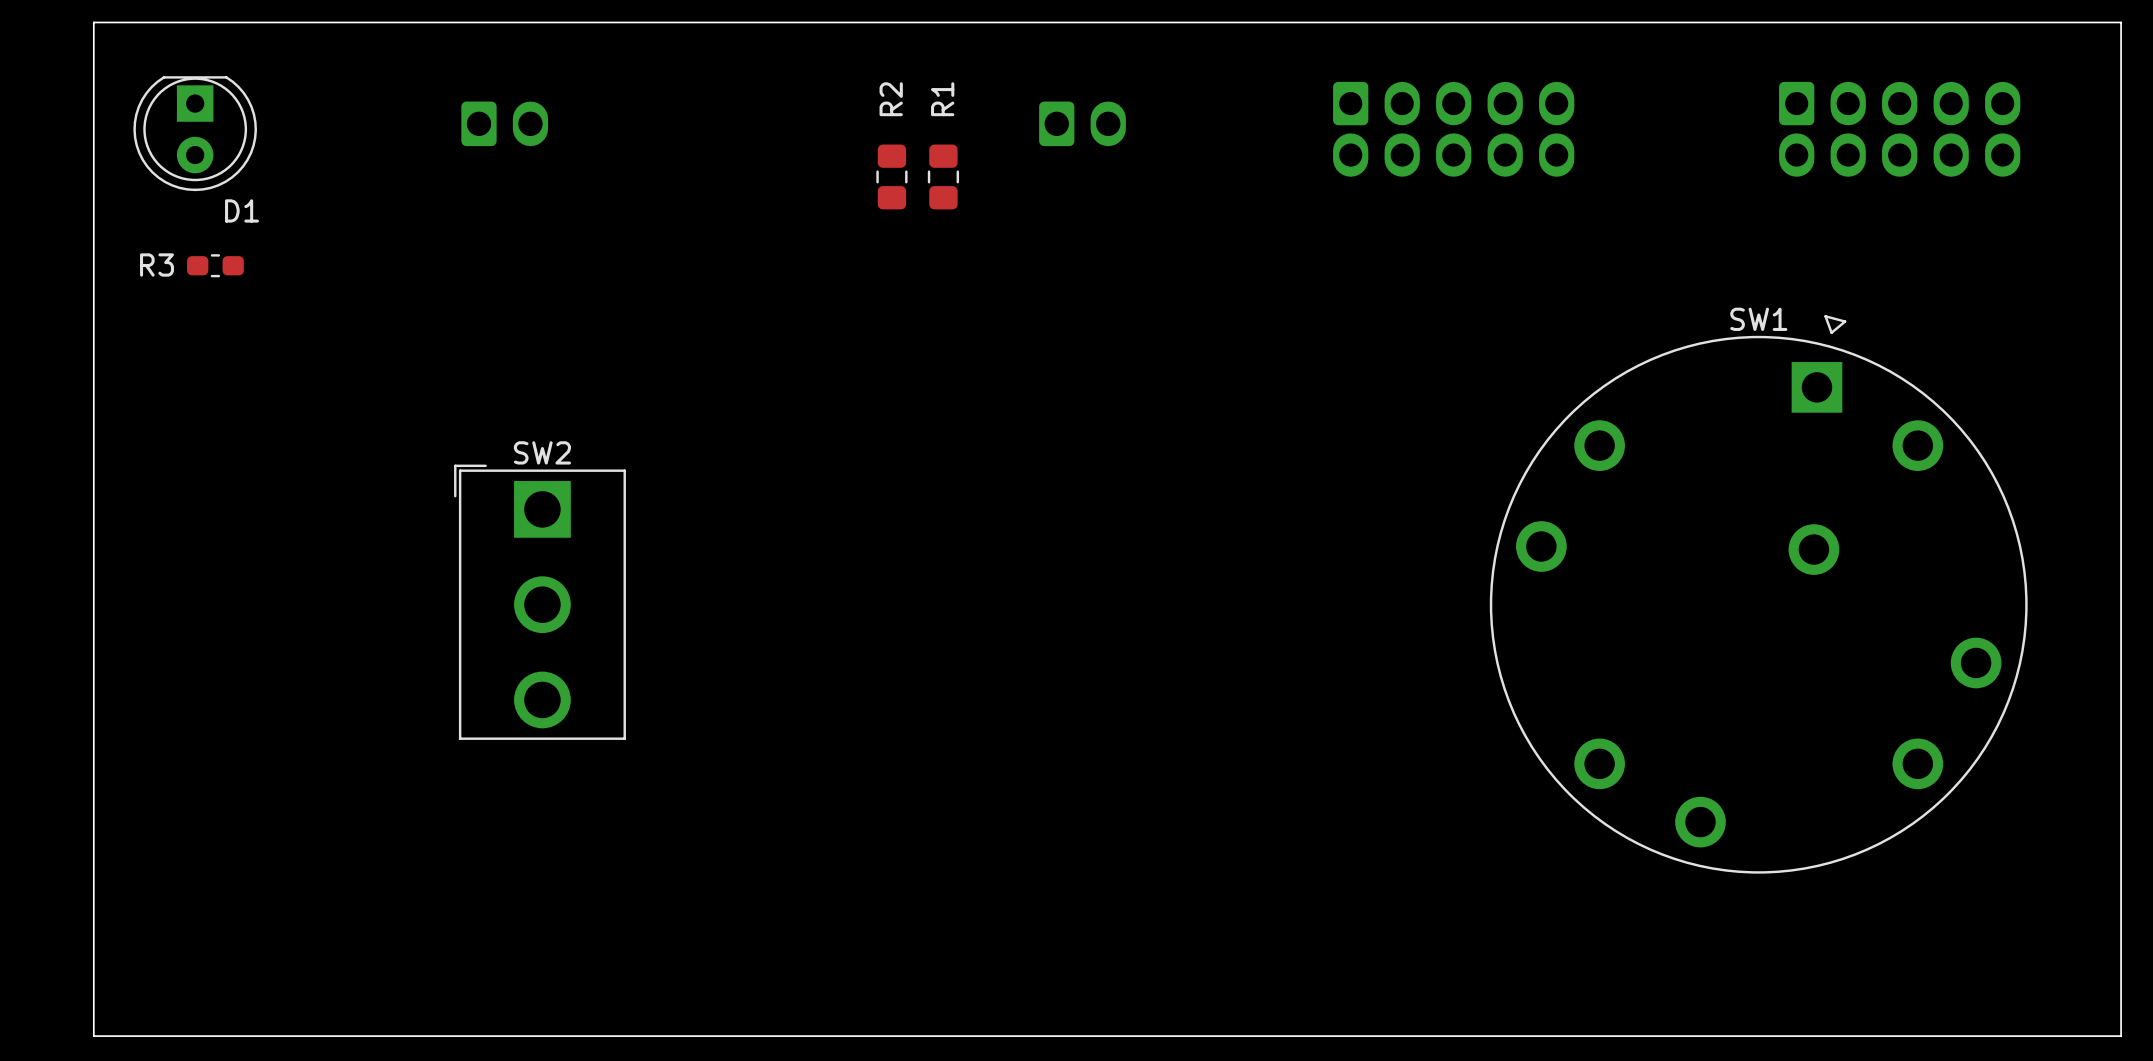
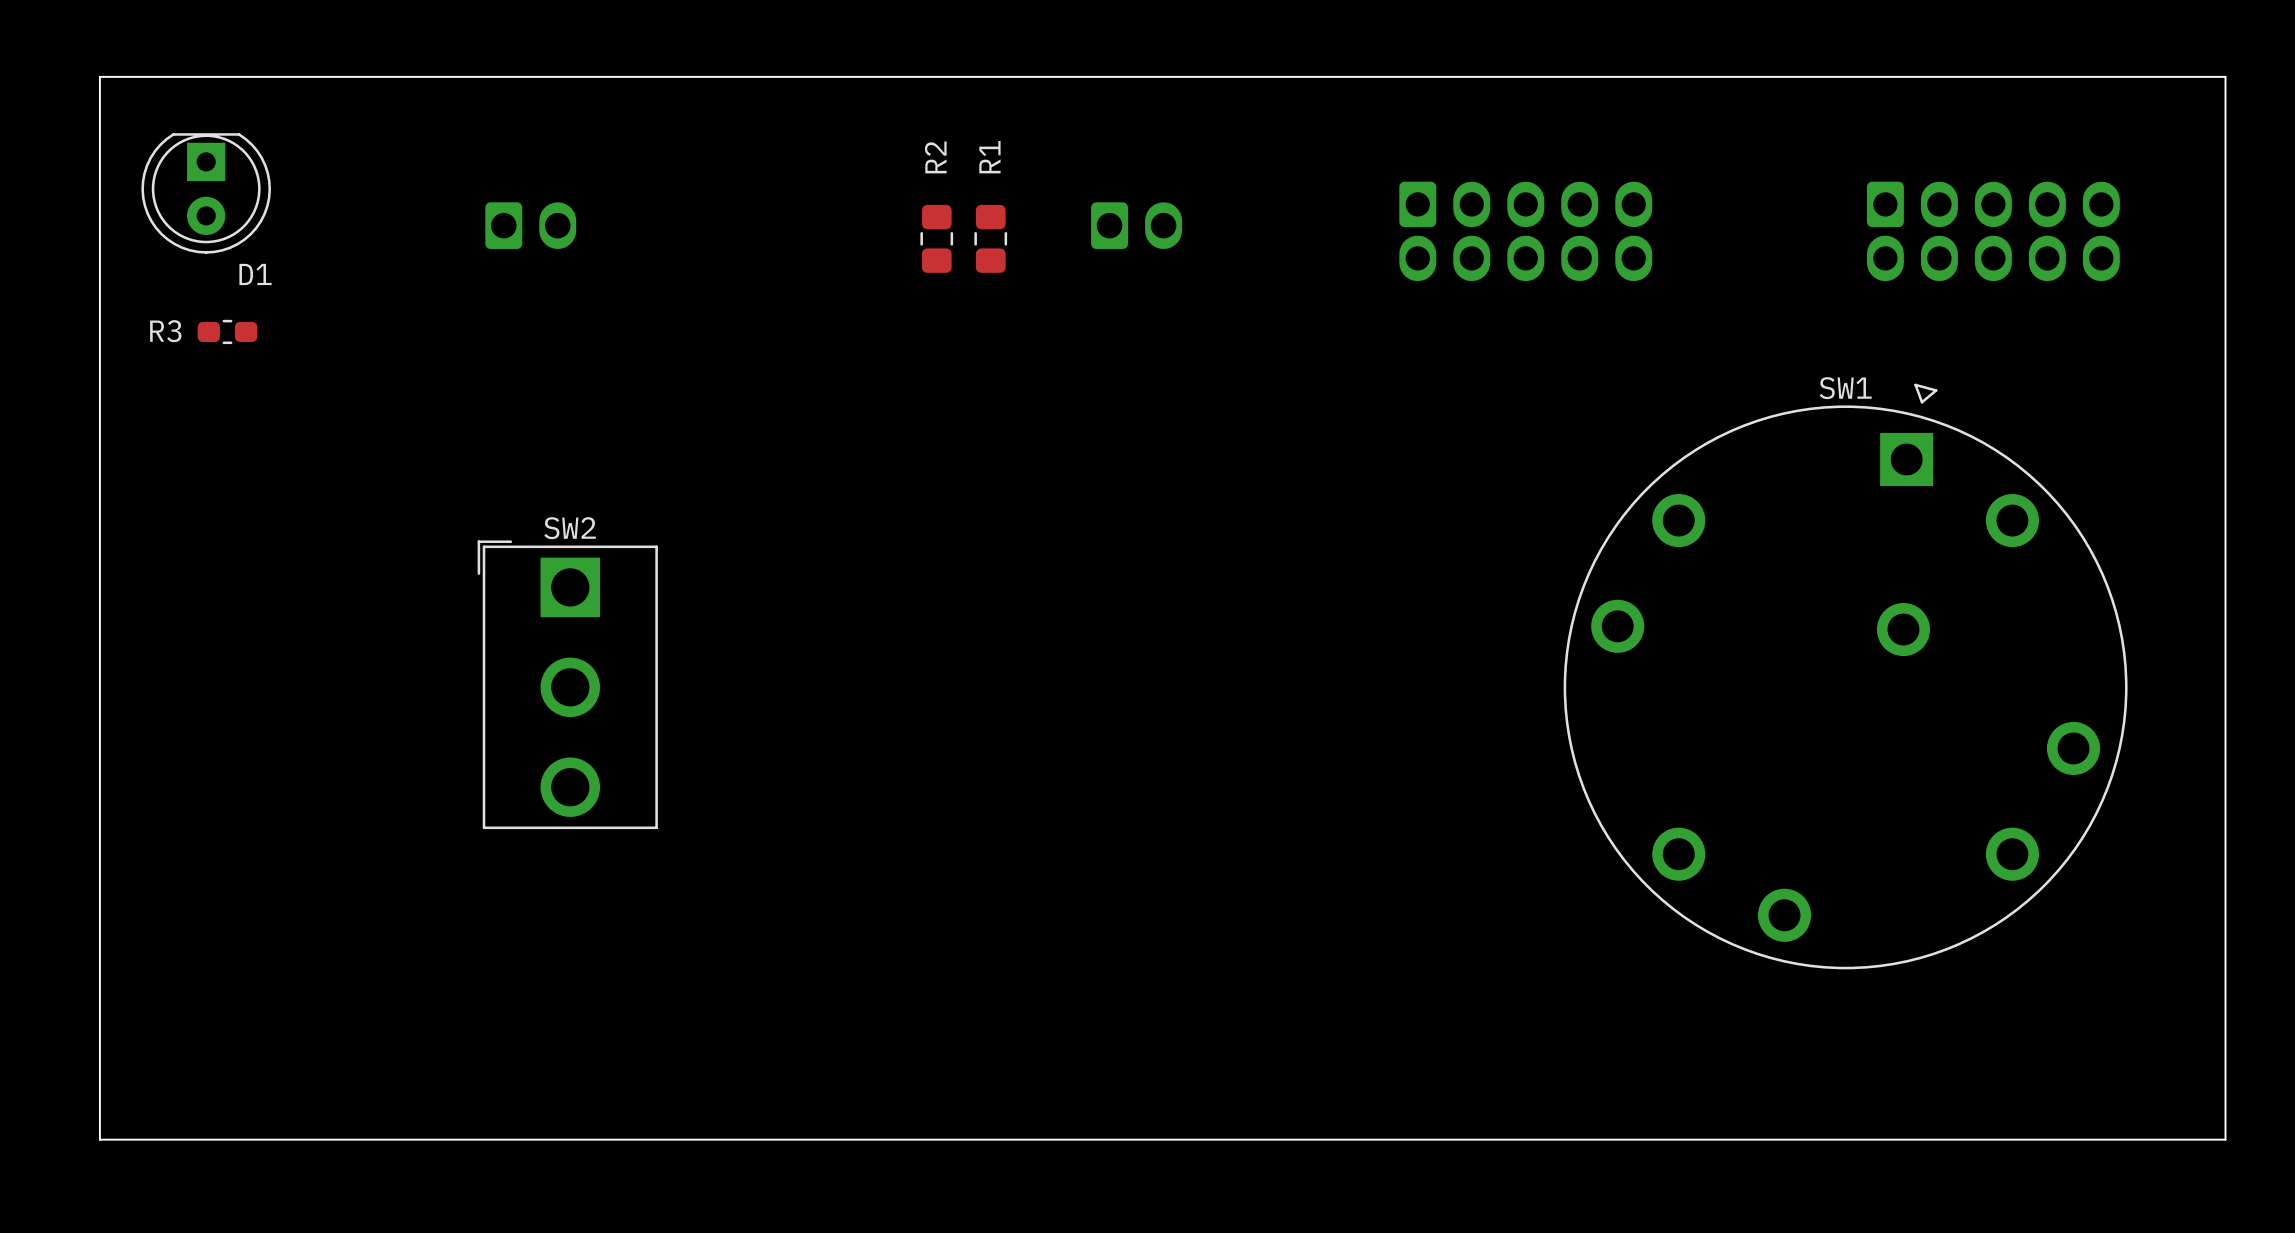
part position: (504, 123) -> (530, 225)
part position: (1082, 123) -> (1136, 225)
part position: (1453, 129) -> (1525, 231)
part position: (1899, 129) -> (1993, 231)

